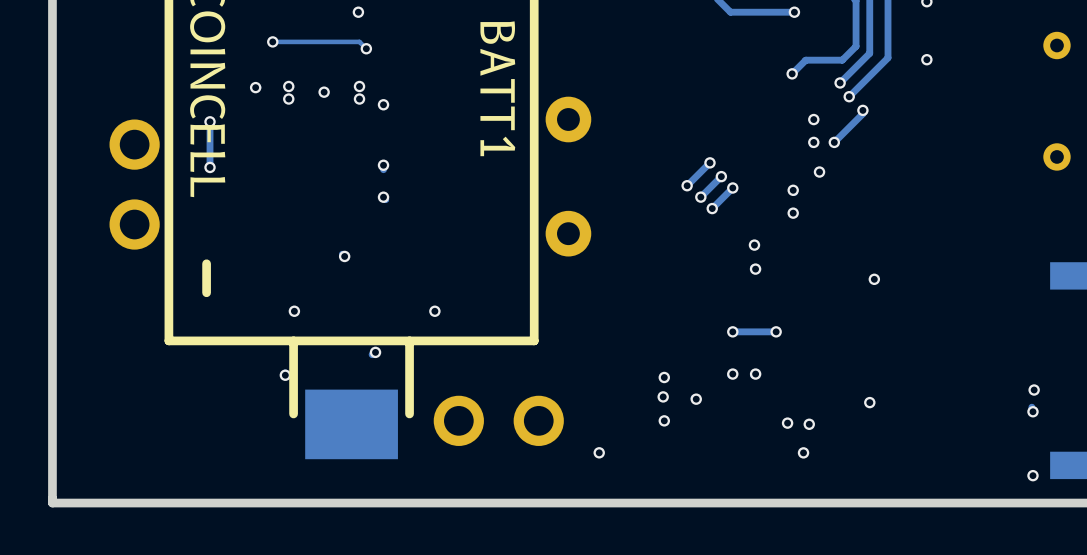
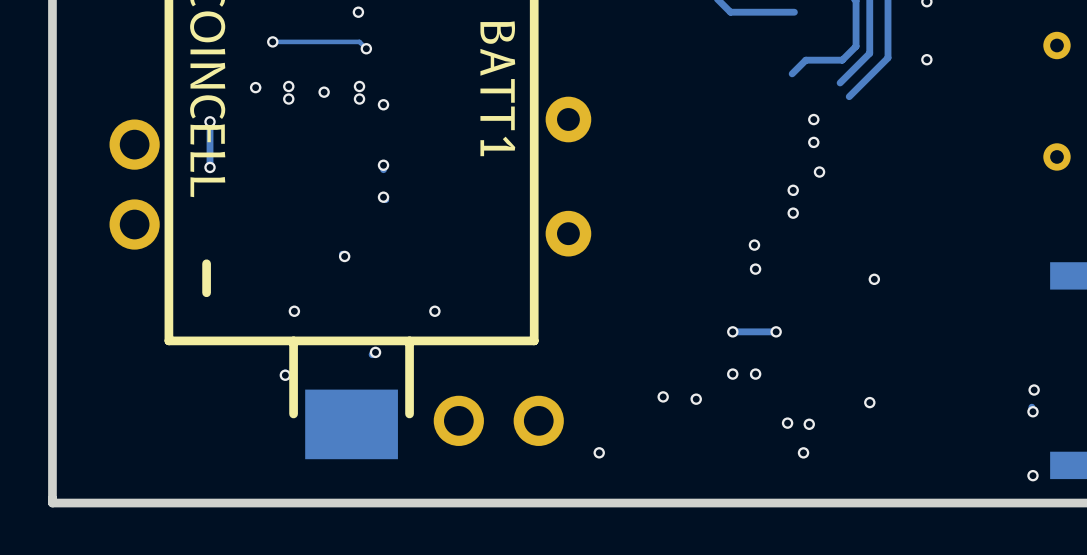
via: (794, 12) -> none
via: (792, 73) -> none
via: (840, 82) -> none
via: (849, 96) -> none
track: (862, 110) (862, 113) (834, 142) -> none
via: (862, 110) -> none
via: (834, 142) -> none
track: (709, 162) (687, 185) -> none
via: (709, 162) -> none
track: (721, 176) (700, 197) -> none
via: (721, 176) -> none
via: (687, 185) -> none
via: (732, 187) -> none
track: (732, 188) (712, 208) -> none
via: (700, 197) -> none
via: (712, 208) -> none
via: (664, 377) -> none
via: (664, 420) -> none

